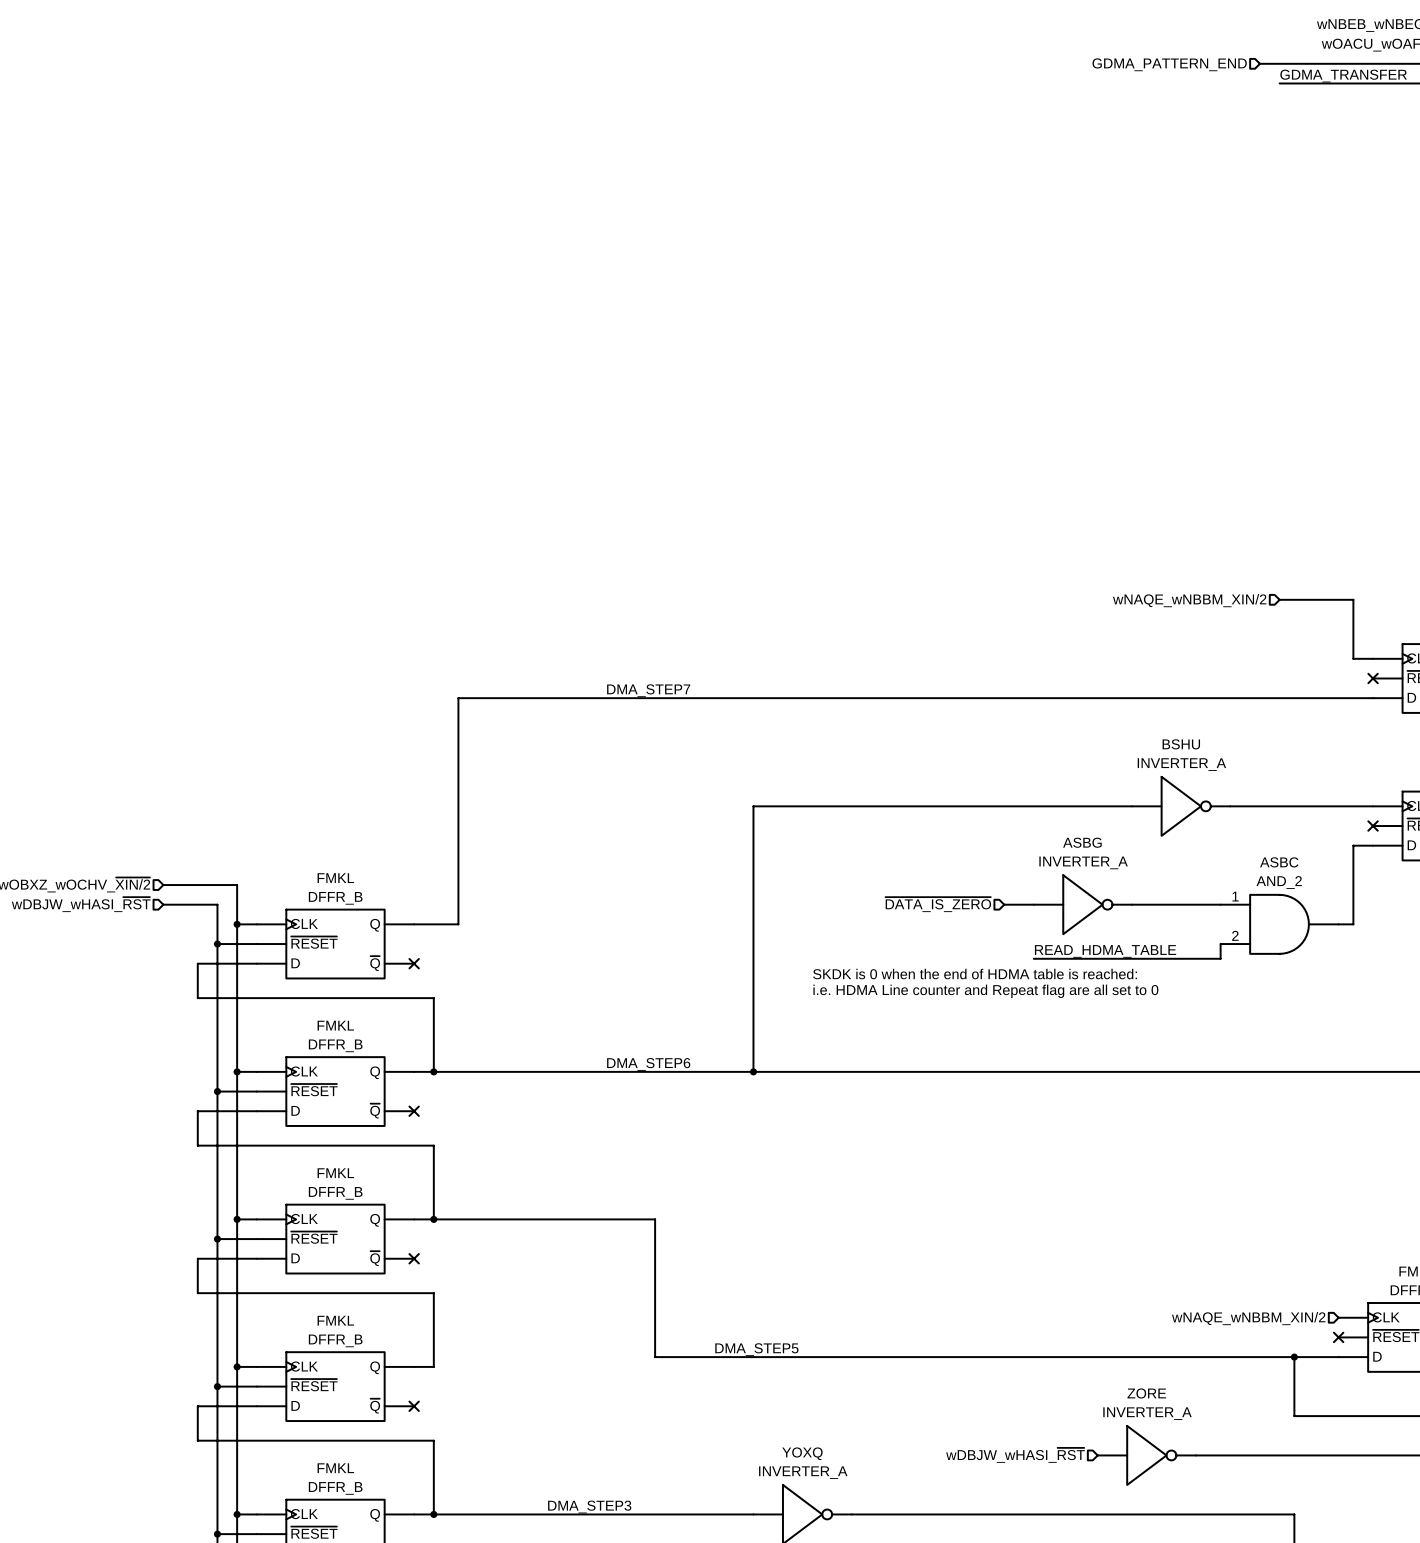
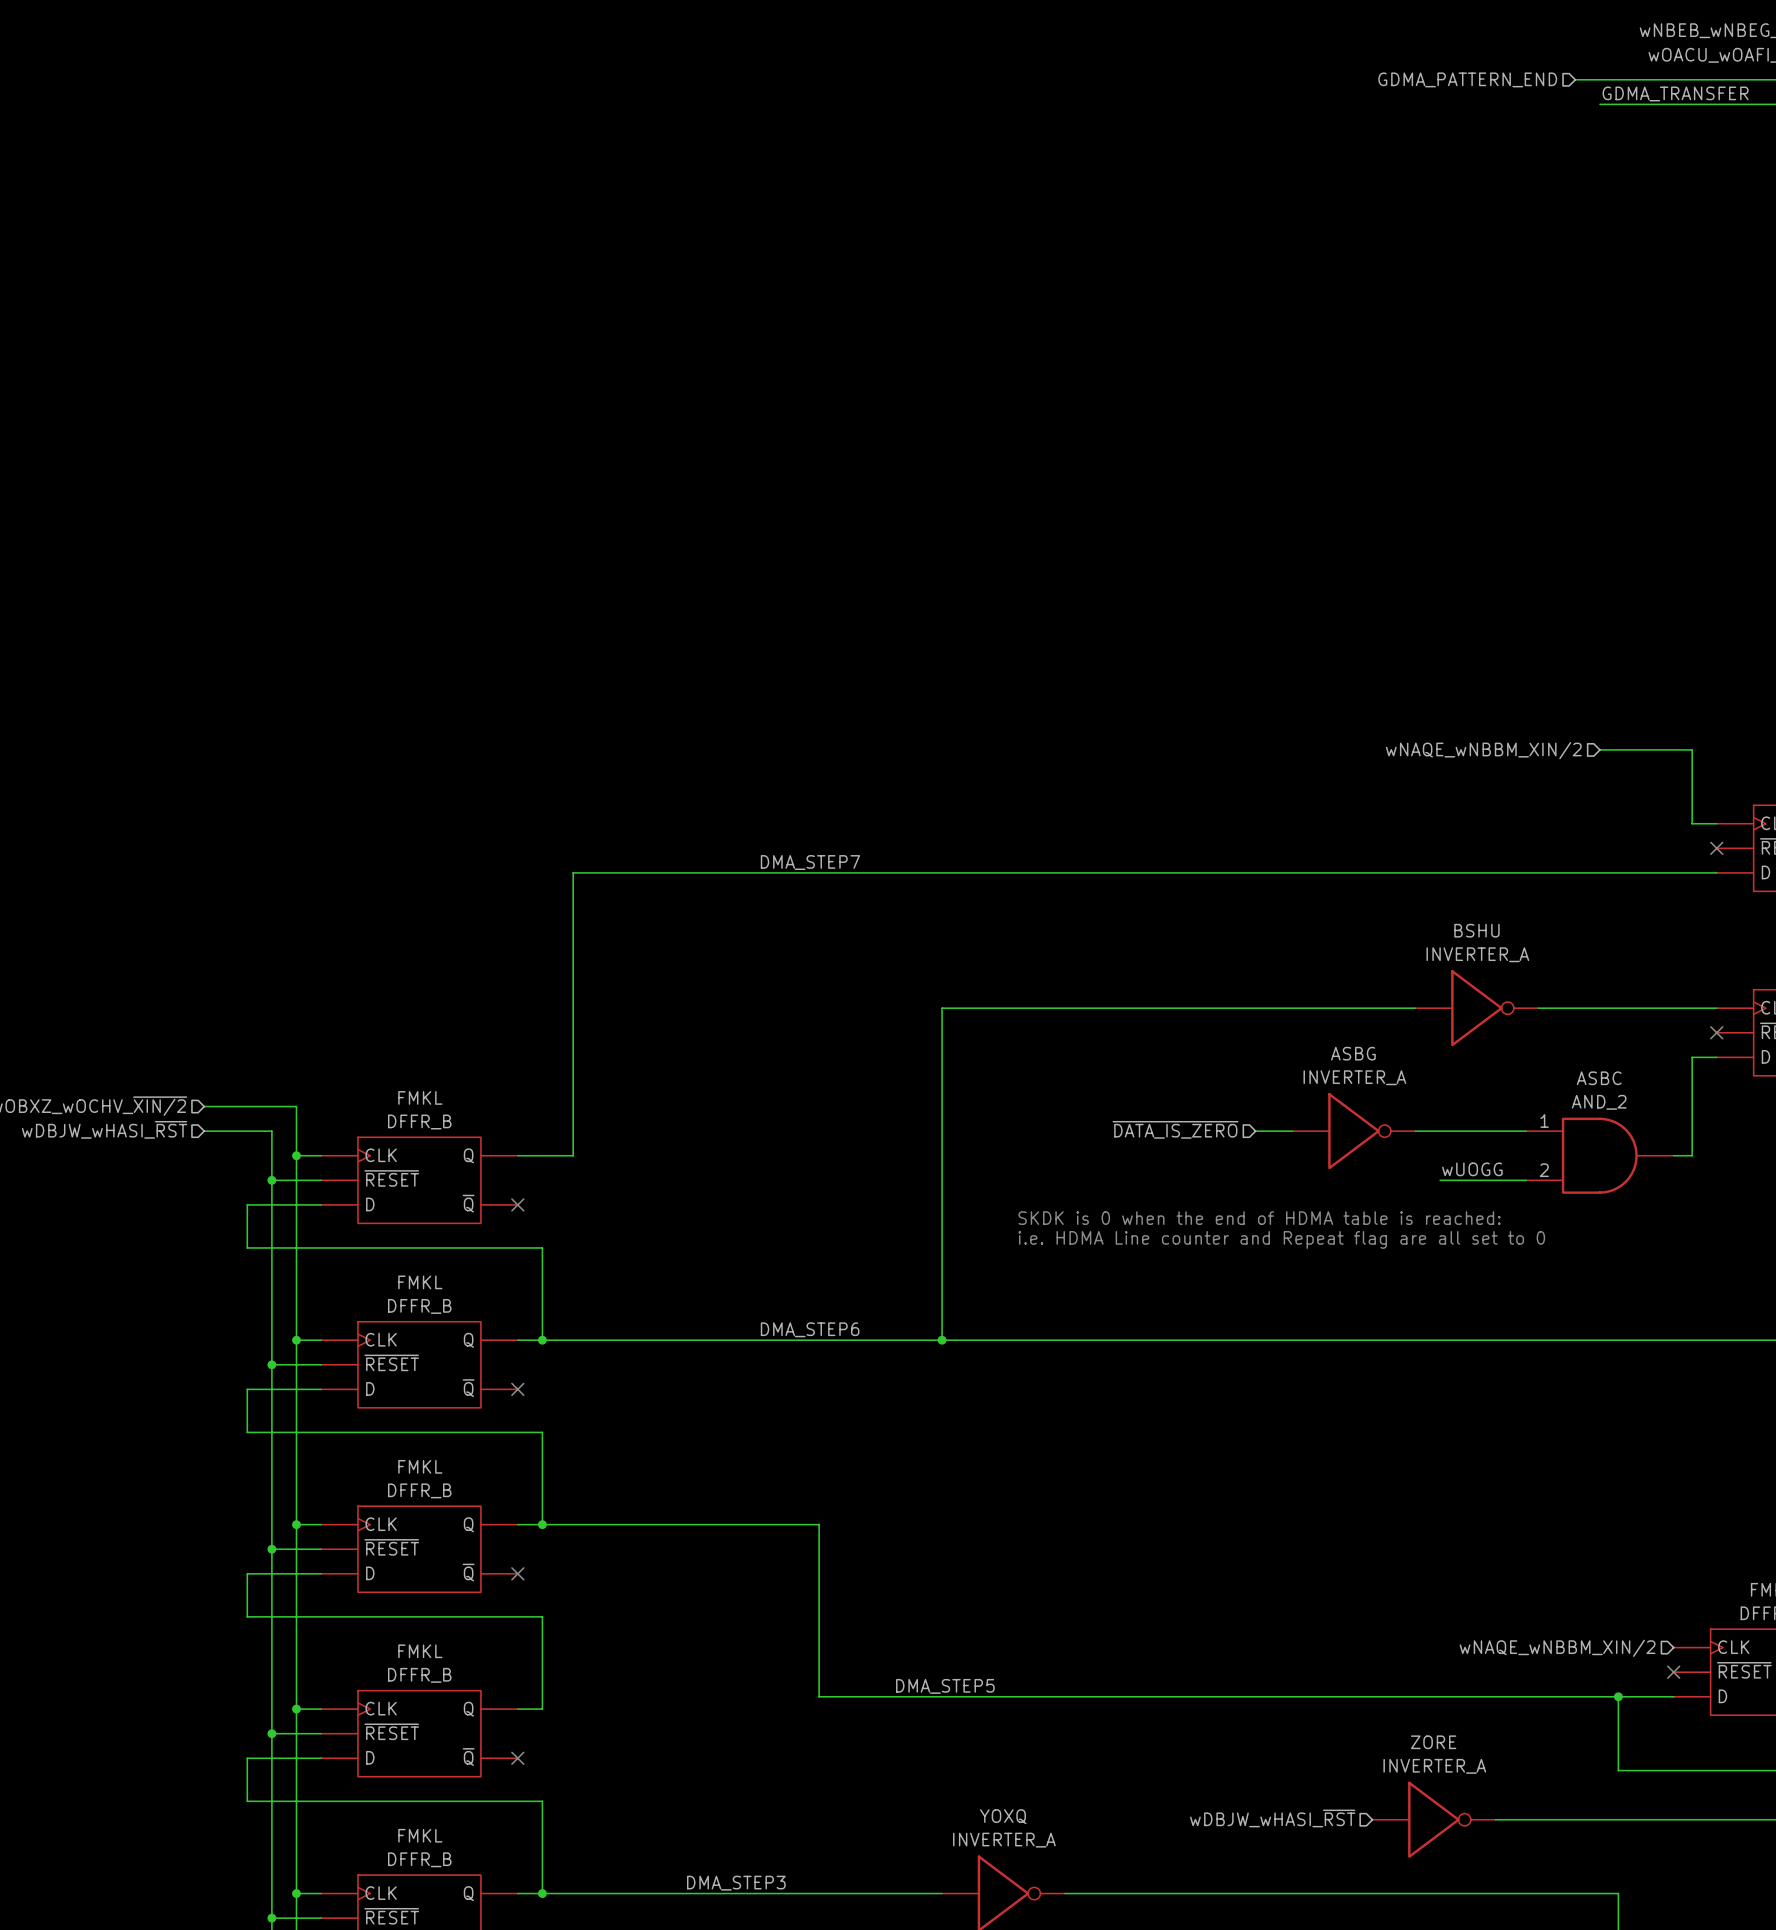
label: none -> wUOGG (1472, 1169)
wire: (1220, 944) (1220, 958) (1033, 958) -> (1526, 1180) (1440, 1180)
label: READ_HDMA_TABLE (1105, 951) -> none

